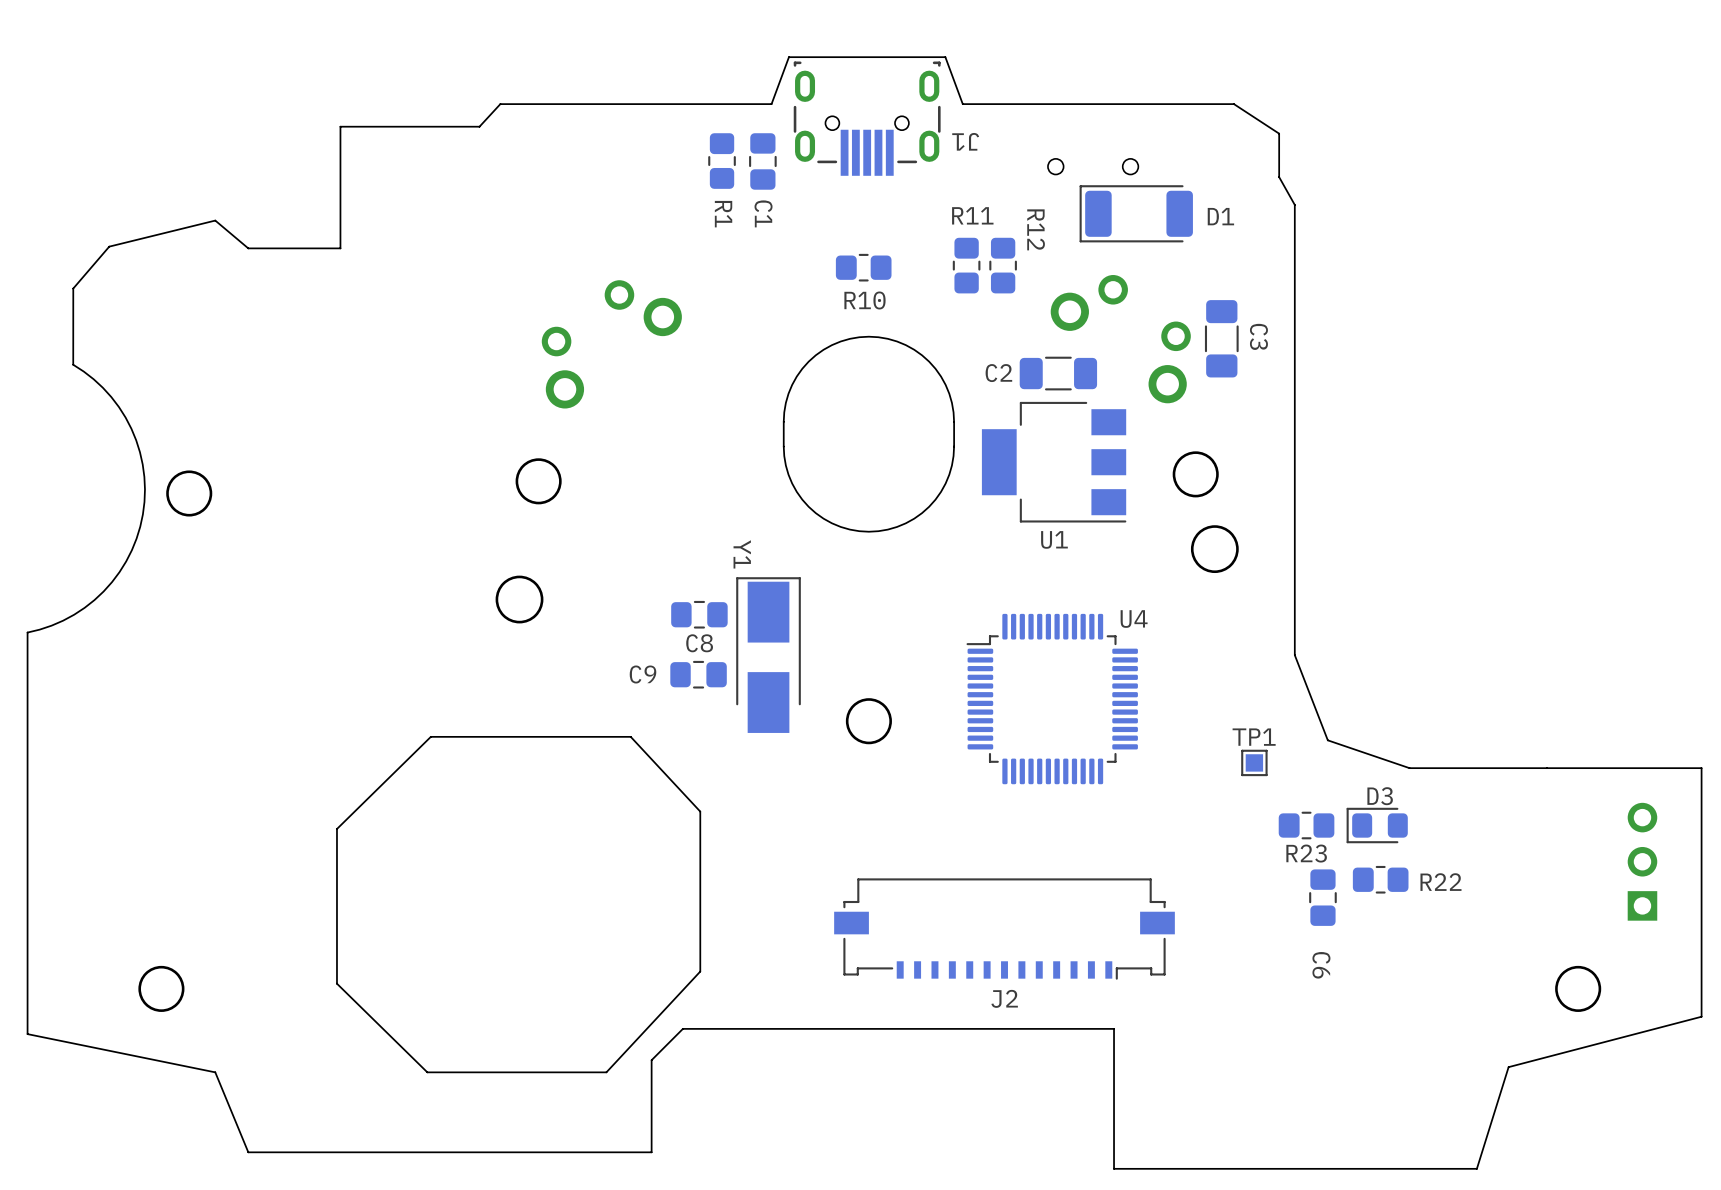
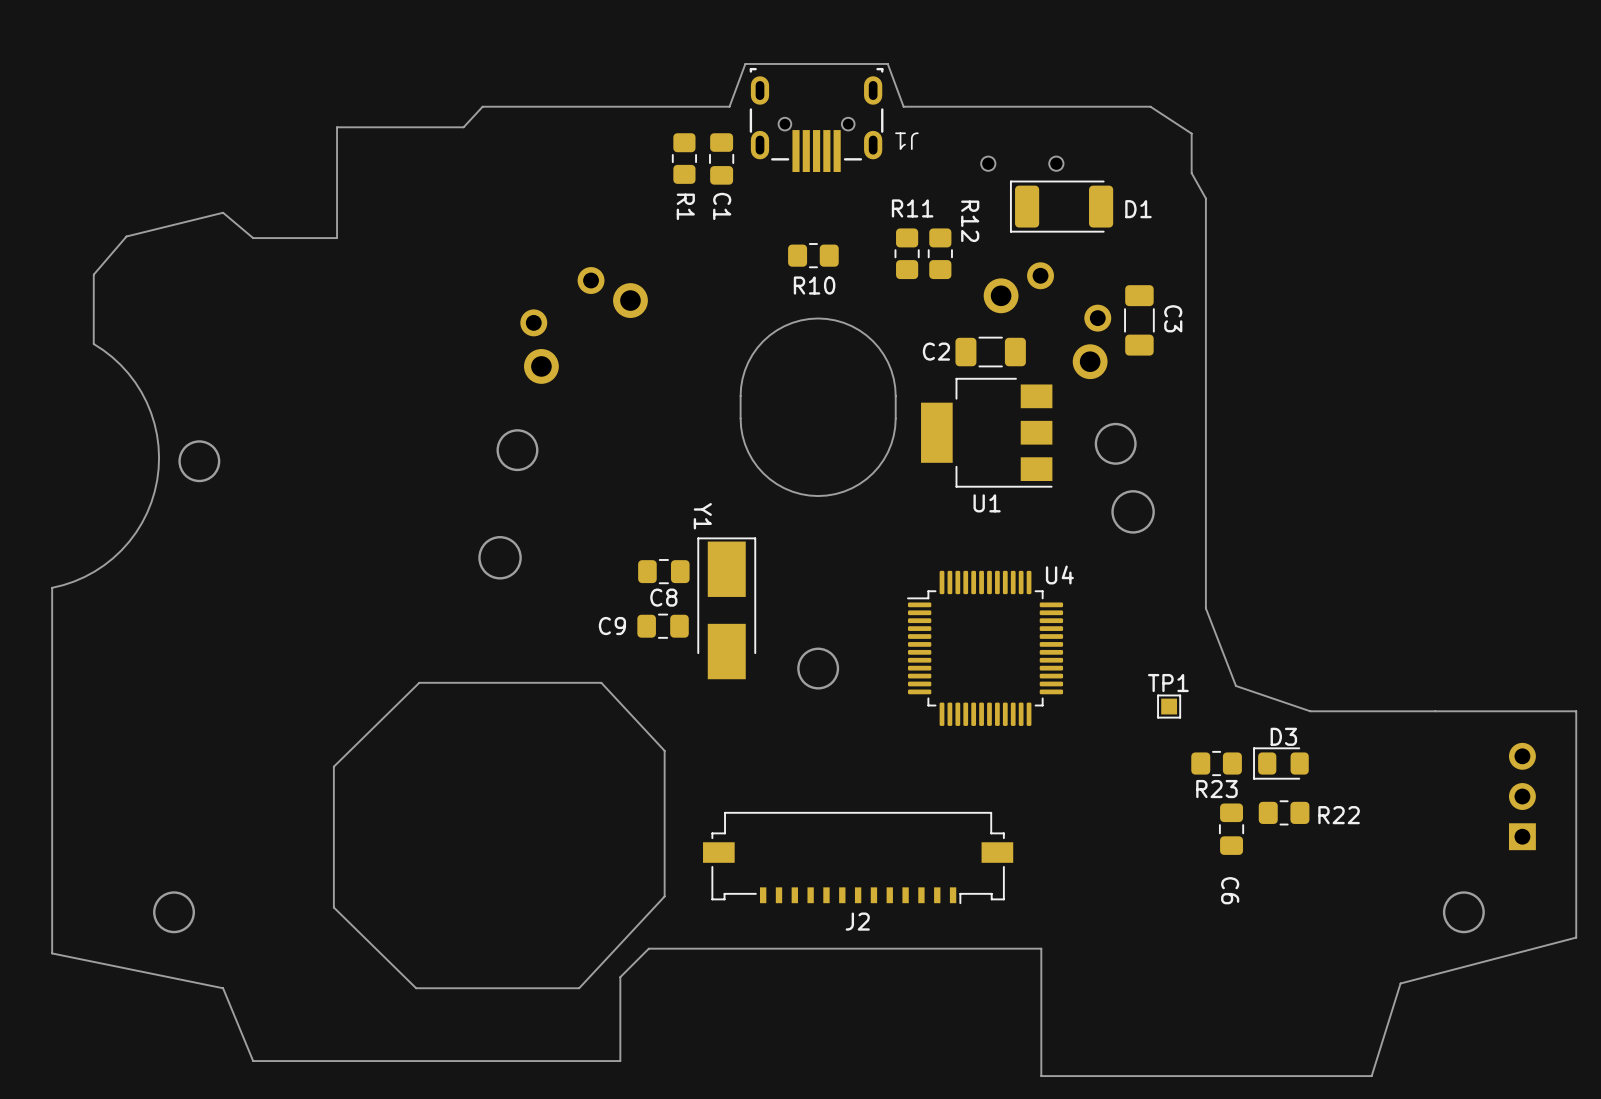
J2 position: (1004, 929) -> (858, 857)

